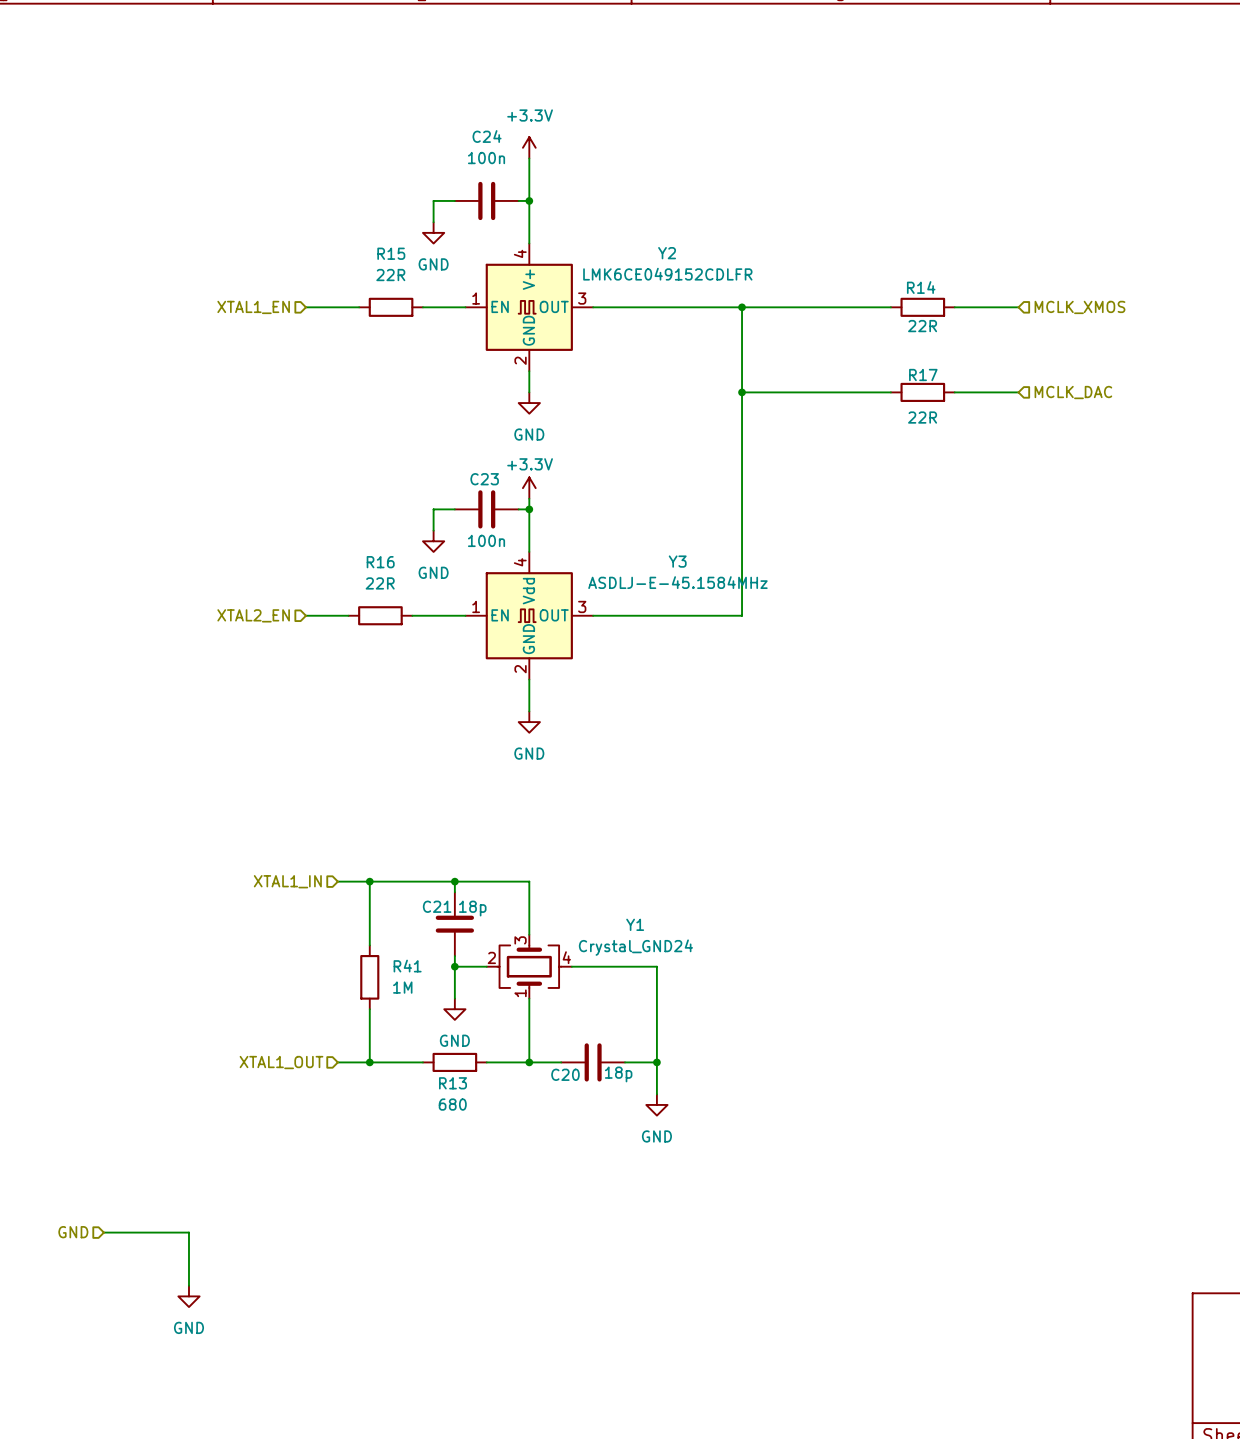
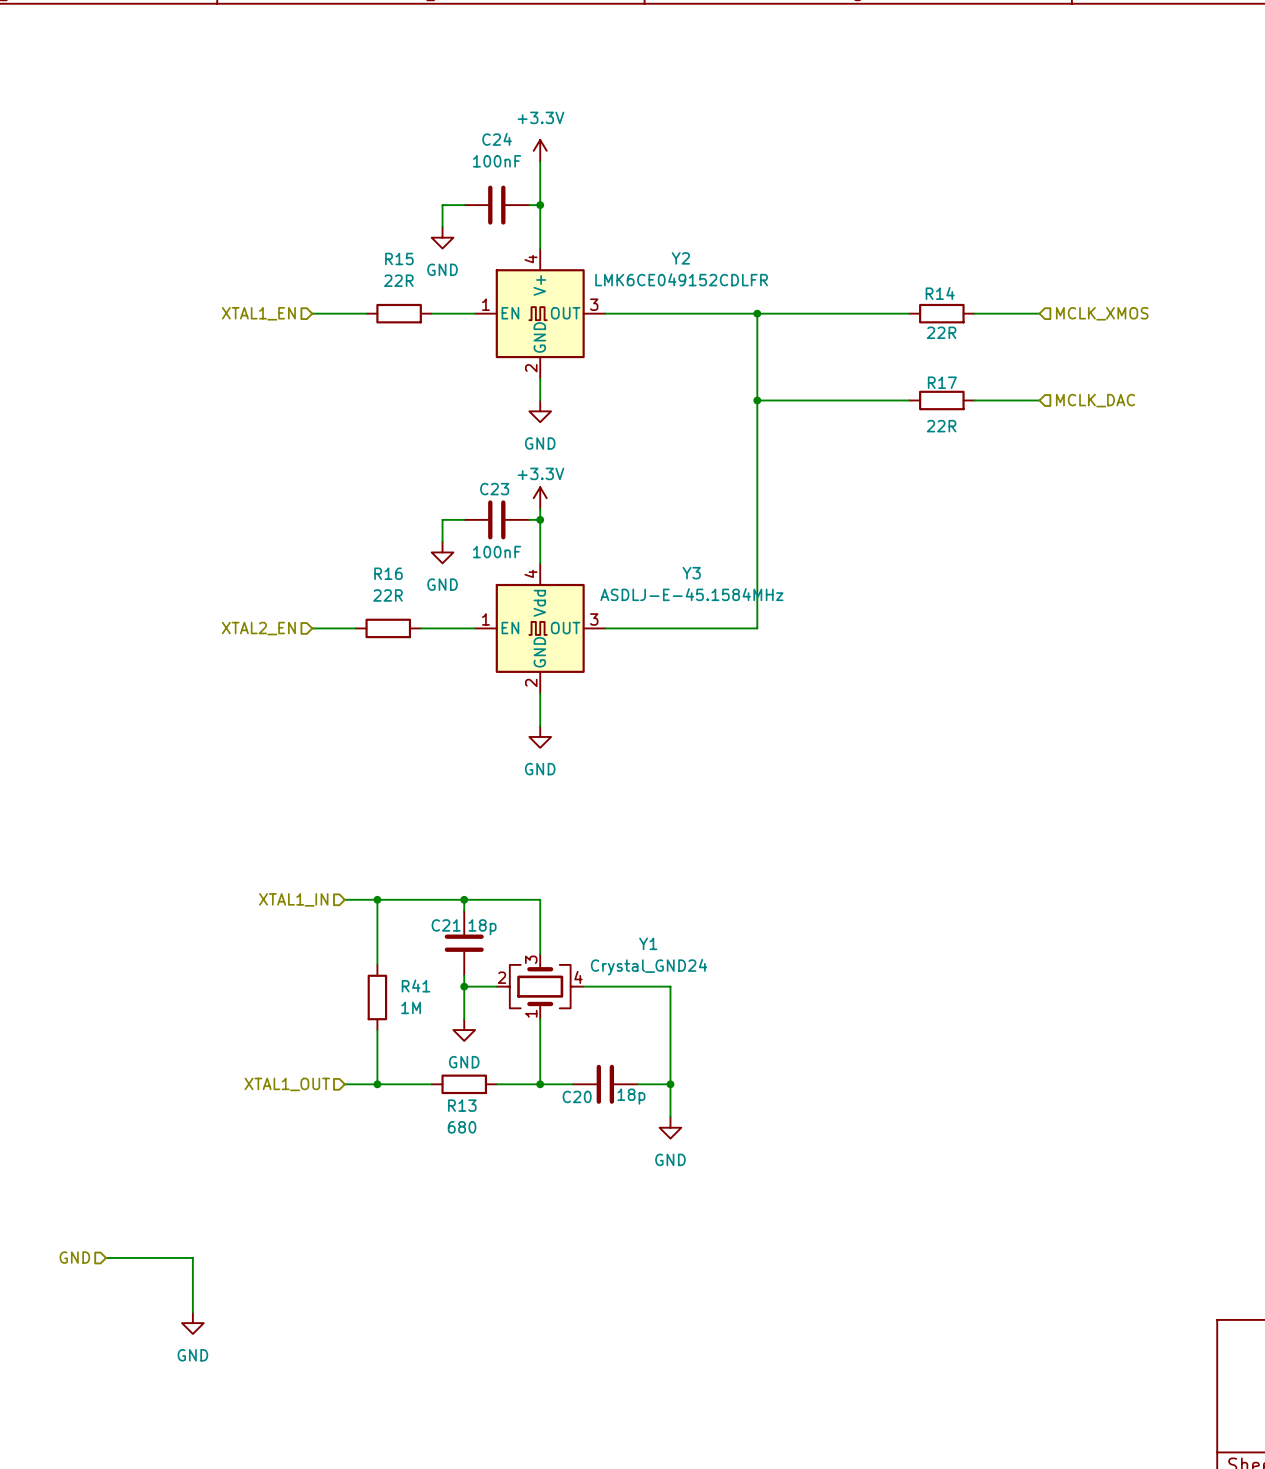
C24 value: 100n (486, 158) -> 100nF (497, 161)
C23 value: 100n (486, 540) -> 100nF (497, 552)

